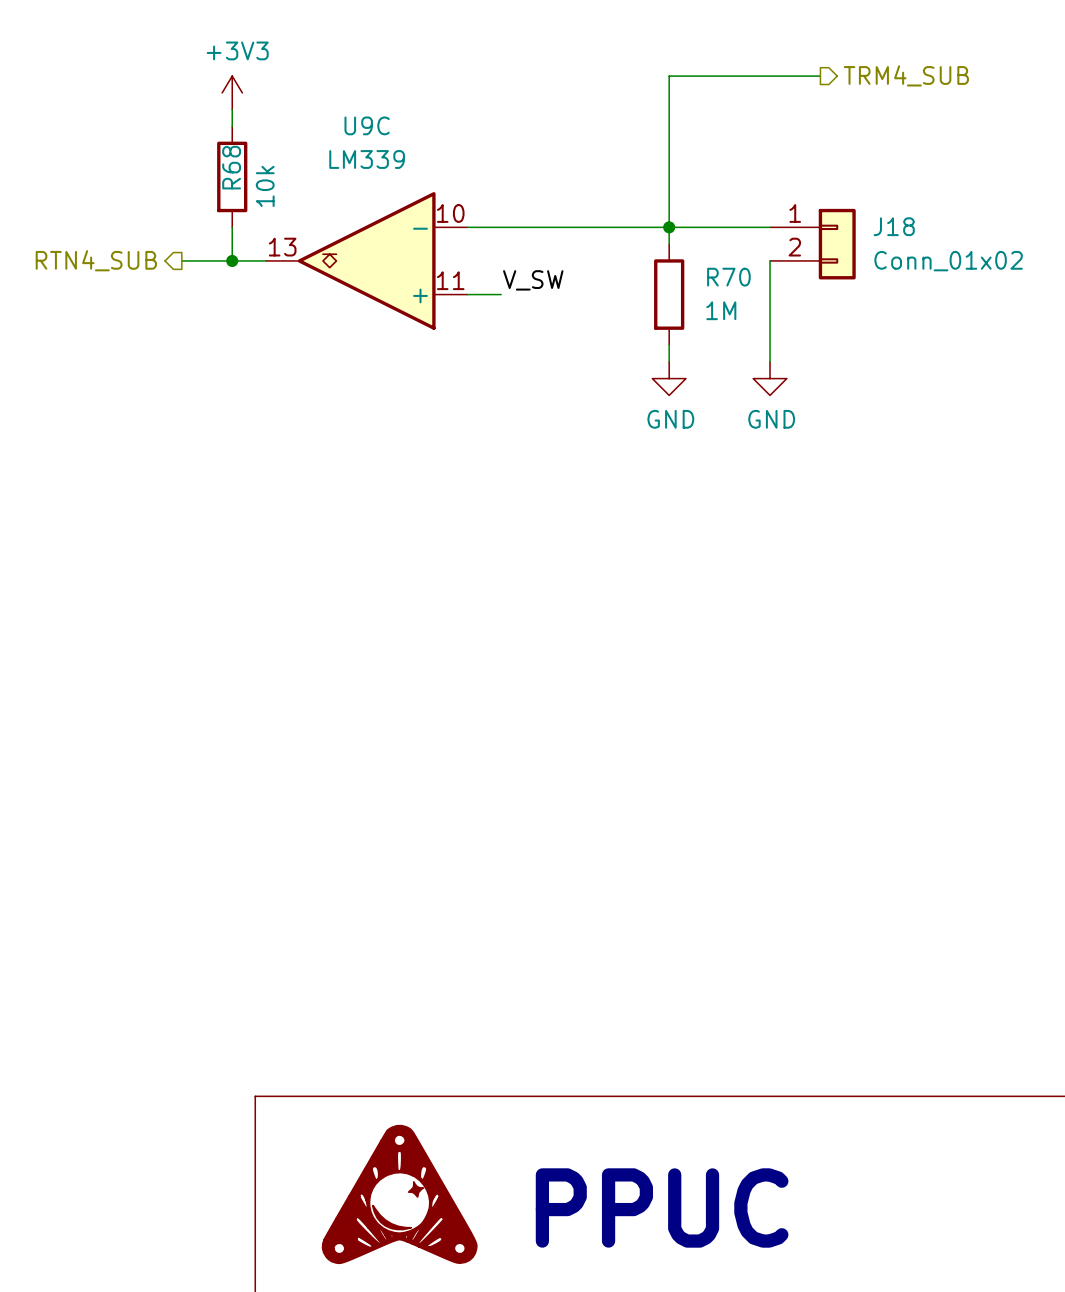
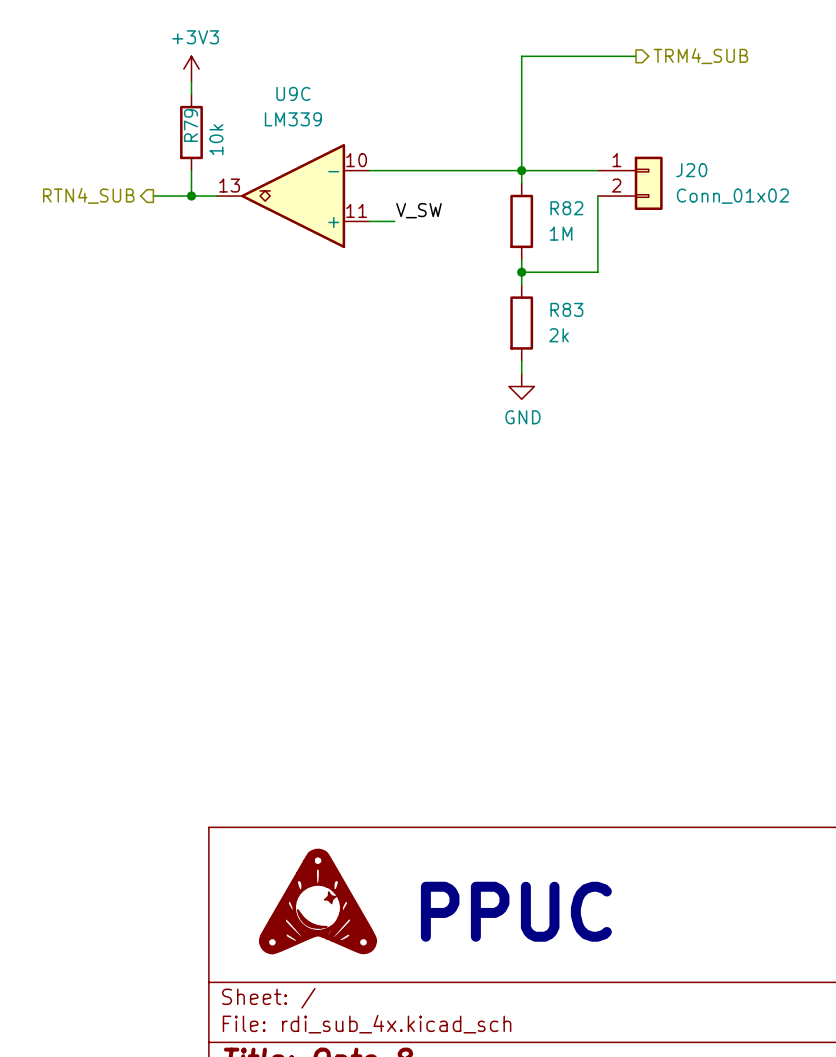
R68 name: R68 (231, 167) -> R79 (191, 125)
J18 name: J18 (894, 226) -> J20 (691, 170)
R70 name: R70 (728, 277) -> R82 (566, 208)
junction: none -> (521, 272)
wire: none -> (597, 272) (521, 272) (521, 284)
power symbol: GND (669, 378) -> none
power symbol: GND (770, 378) -> none
R83: none -> 2k (521, 323)
wire: none -> (521, 361) (521, 373)
power symbol: none -> GND (521, 386)

